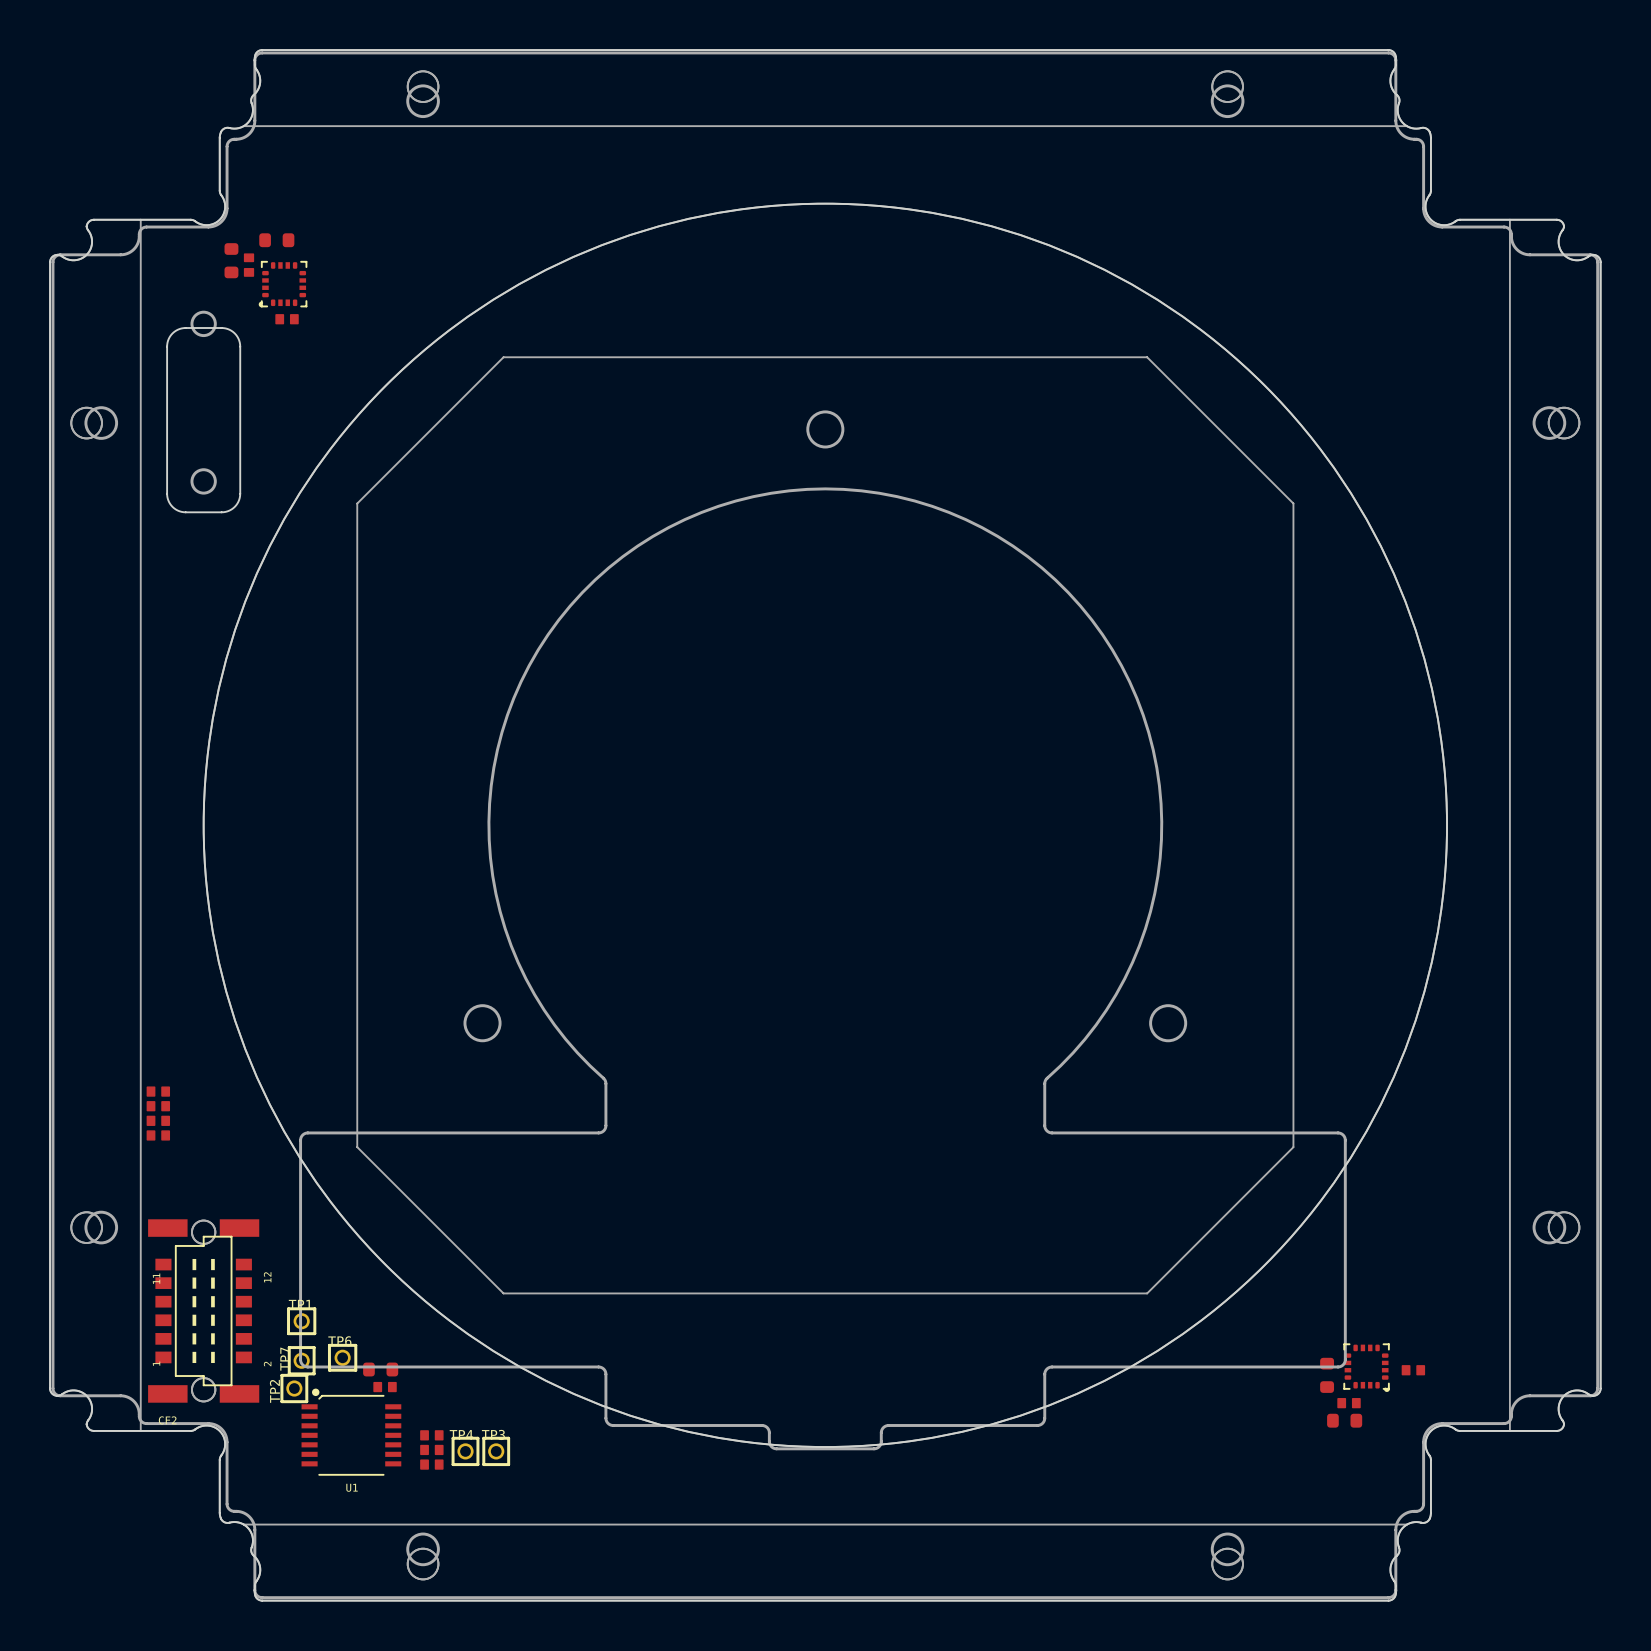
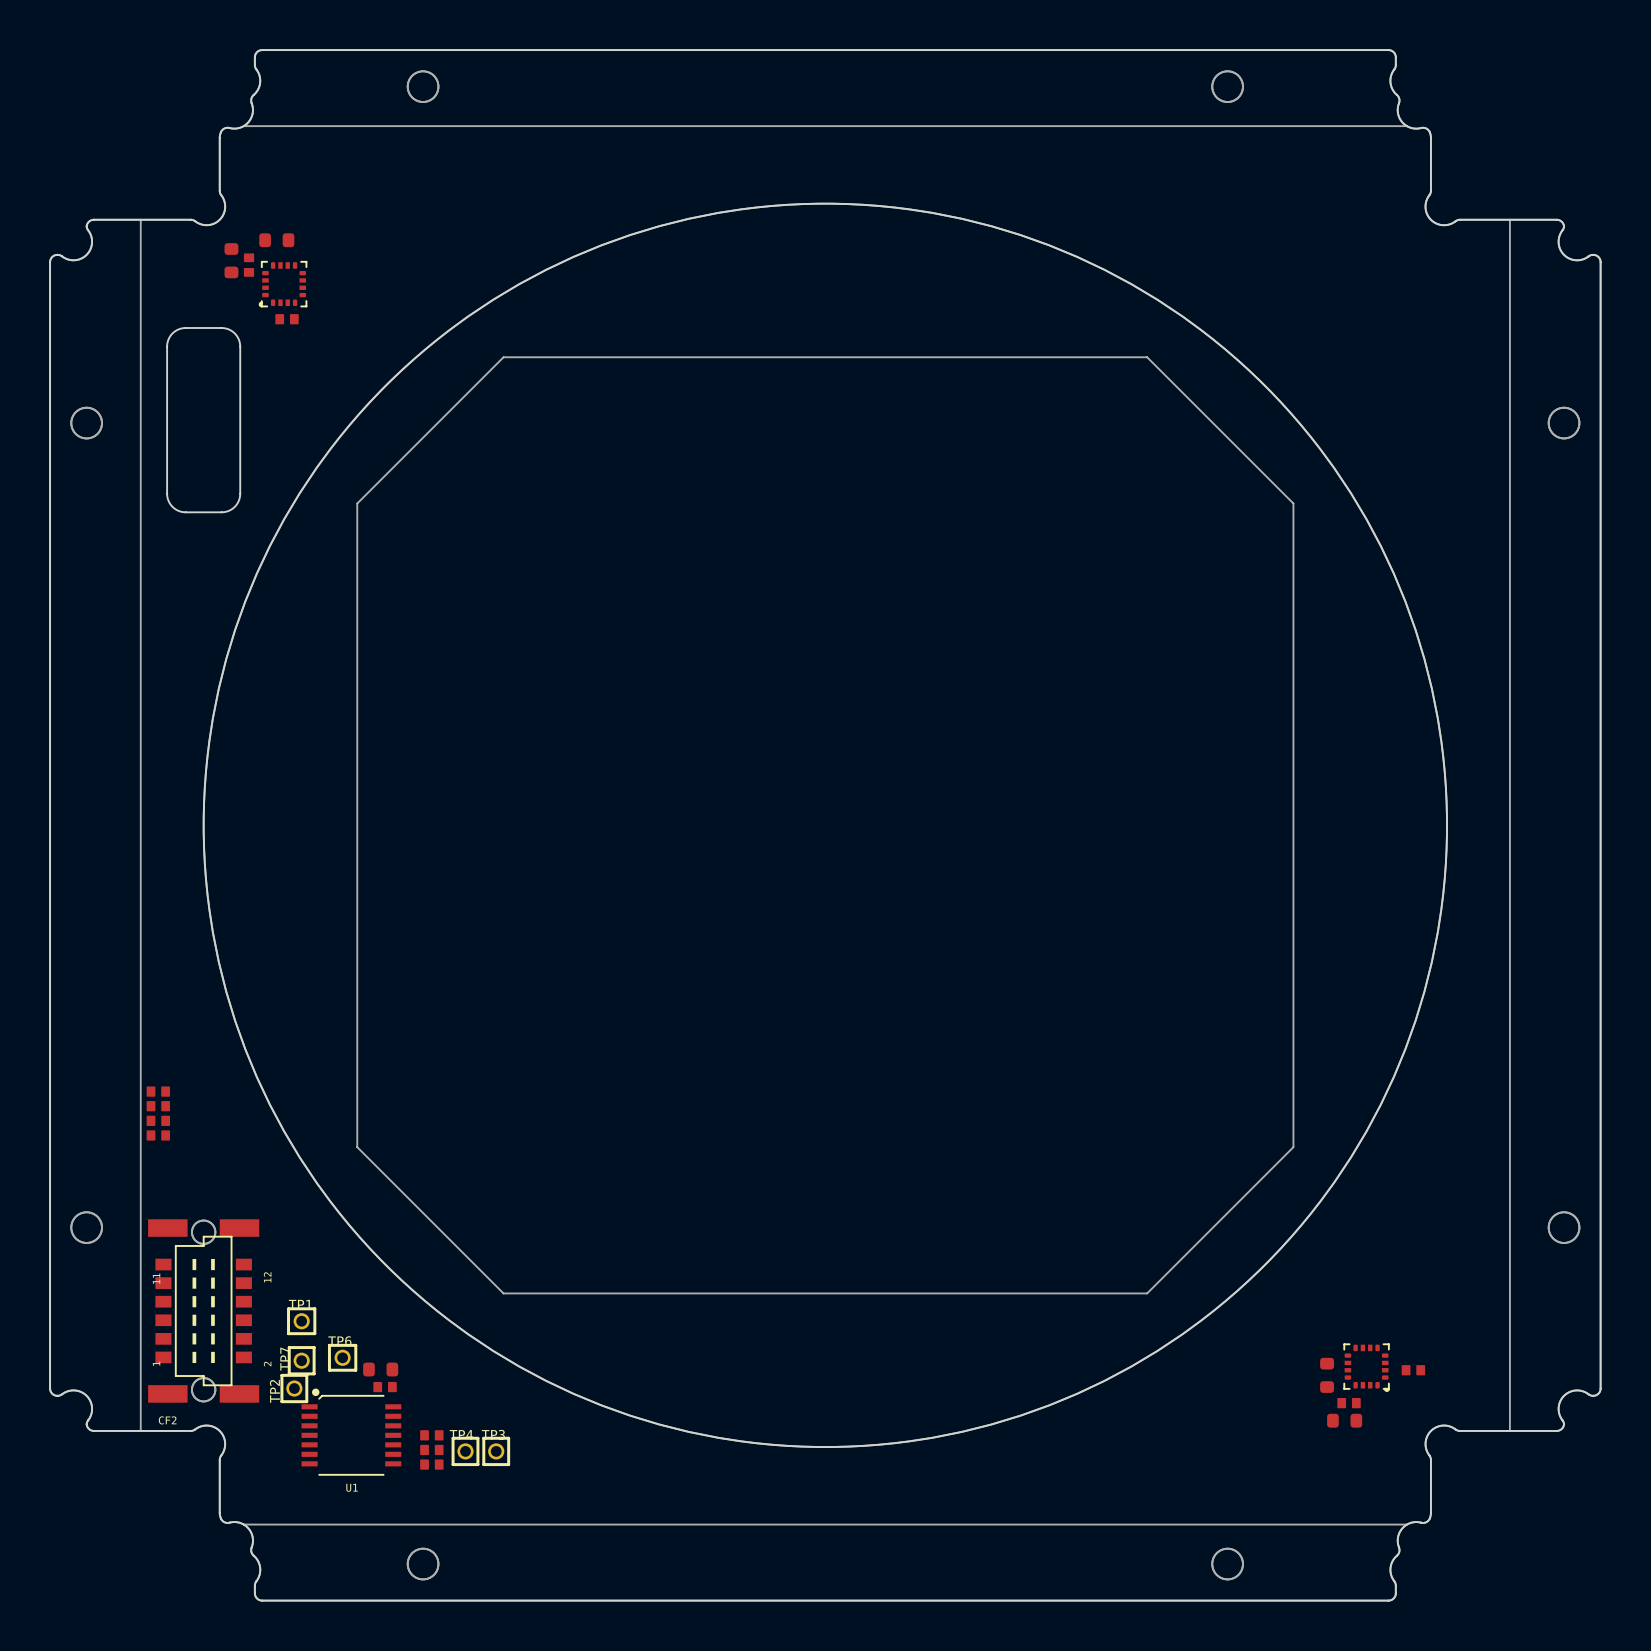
line: (262, 52) (1389, 53) (1393, 55) (1395, 59) (1396, 126) (1404, 136) (1419, 139) (1423, 144) (1423, 210) (1429, 221) (1440, 226) (1505, 227) (1510, 231) (1515, 247) (1525, 254) (1590, 254) (1596, 257) (1597, 262) (1597, 1389) (1595, 1393) (1591, 1395) (1523, 1396) (1514, 1404) (1510, 1419) (1505, 1423) (1440, 1423) (1429, 1429) (1423, 1440) (1423, 1505) (1419, 1510) (1402, 1515) (1396, 1525) (1395, 1590) (1392, 1596) (1388, 1597) (261, 1597) (256, 1595) (254, 1591) (253, 1523) (246, 1514) (231, 1510) (227, 1505) (226, 1440) (221, 1429) (210, 1423) (144, 1423) (139, 1419) (135, 1402) (124, 1396) (60, 1395) (54, 1392) (52, 1388) (53, 261) (55, 256) (59, 254) (126, 253) (136, 246) (139, 231) (144, 227) (210, 226) (221, 221) (226, 210) (227, 144) (231, 139) (246, 136) (253, 126) (254, 59) (256, 55) (262, 52) -> none
drawing: [406, 84, 440, 119] -> none
drawing: [1210, 84, 1245, 119] -> none
drawing: [190, 310, 217, 338] -> none
drawing: [84, 406, 119, 440] -> none
drawing: [1532, 406, 1567, 440] -> none
drawing: [806, 410, 845, 449] -> none
drawing: [190, 468, 217, 495] -> none
drawing: [463, 1004, 502, 1043] -> none
drawing: [1149, 1004, 1188, 1043] -> none
line: (603, 1078) (577, 1052) (554, 1024) (525, 978) (505, 928) (492, 875) (488, 821) (491, 785) (497, 750) (513, 698) (538, 649) (570, 606) (608, 567) (637, 546) (668, 527) (718, 506) (771, 493) (807, 489) (843, 489) (897, 496) (949, 512) (981, 527) (1027, 556) (1055, 579) (1080, 606) (1102, 634) (1129, 681) (1143, 715) (1156, 767) (1161, 803) (1161, 839) (1154, 893) (1145, 928) (1124, 978) (1106, 1010) (1085, 1039) (1045, 1080) (1045, 1128) (1052, 1132) (1342, 1134) (1345, 1140) (1344, 1362) (1338, 1366) (1051, 1367) (1046, 1369) (1044, 1373) (1044, 1419) (1040, 1424) (887, 1425) (881, 1430) (880, 1445) (873, 1448) (775, 1448) (769, 1443) (768, 1429) (763, 1425) (611, 1425) (605, 1419) (605, 1372) (599, 1367) (307, 1366) (302, 1364) (300, 1359) (300, 1140) (302, 1135) (307, 1132) (600, 1132) (605, 1126) (605, 1083) (603, 1078) -> none
drawing: [84, 1210, 119, 1245] -> none
drawing: [1532, 1210, 1567, 1245] -> none
drawing: [406, 1532, 440, 1567] -> none
drawing: [1210, 1532, 1245, 1567] -> none

